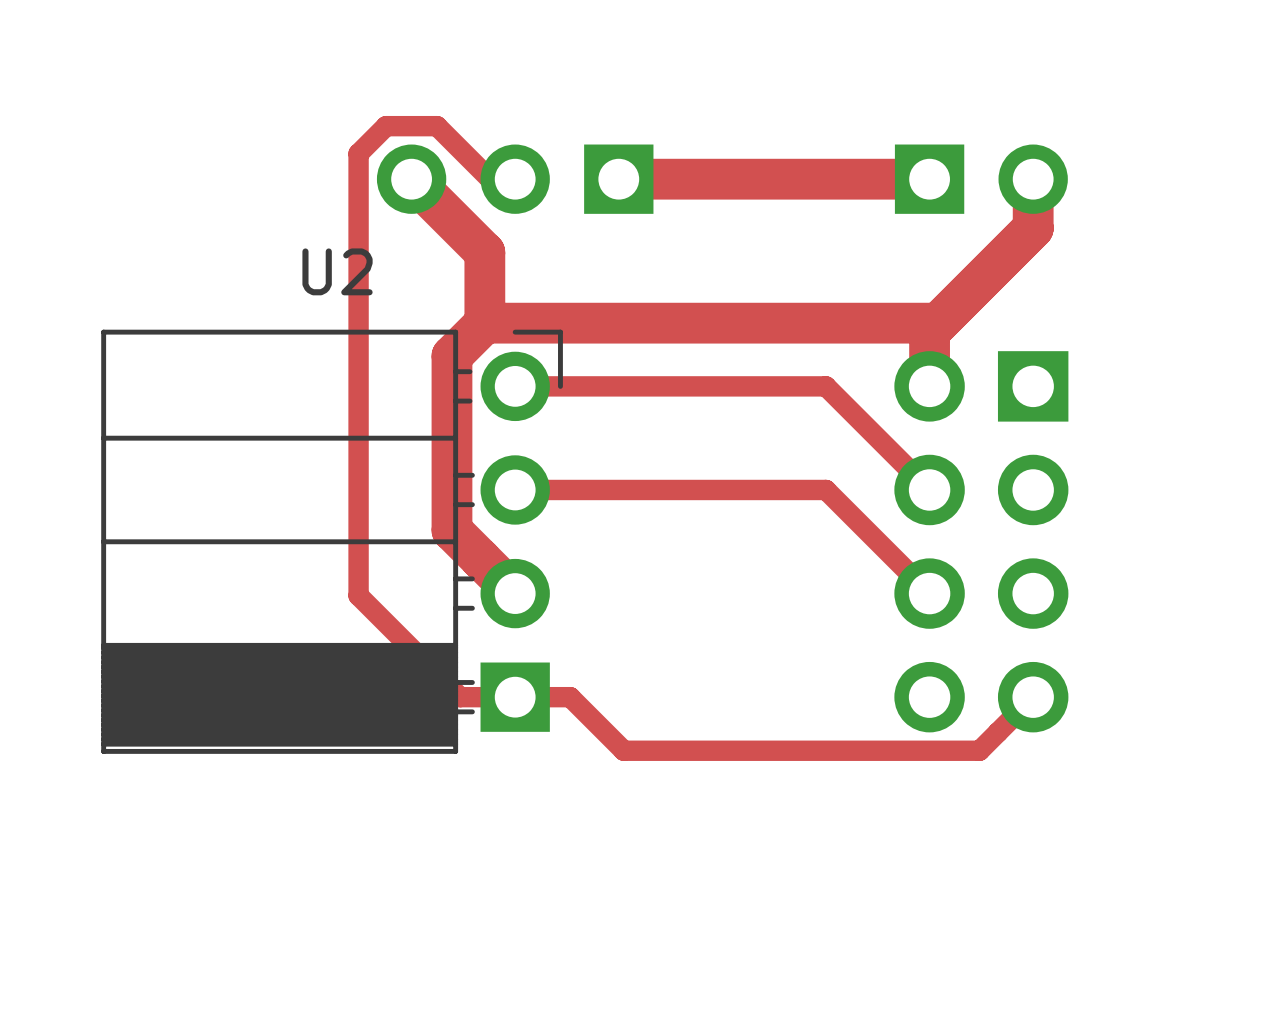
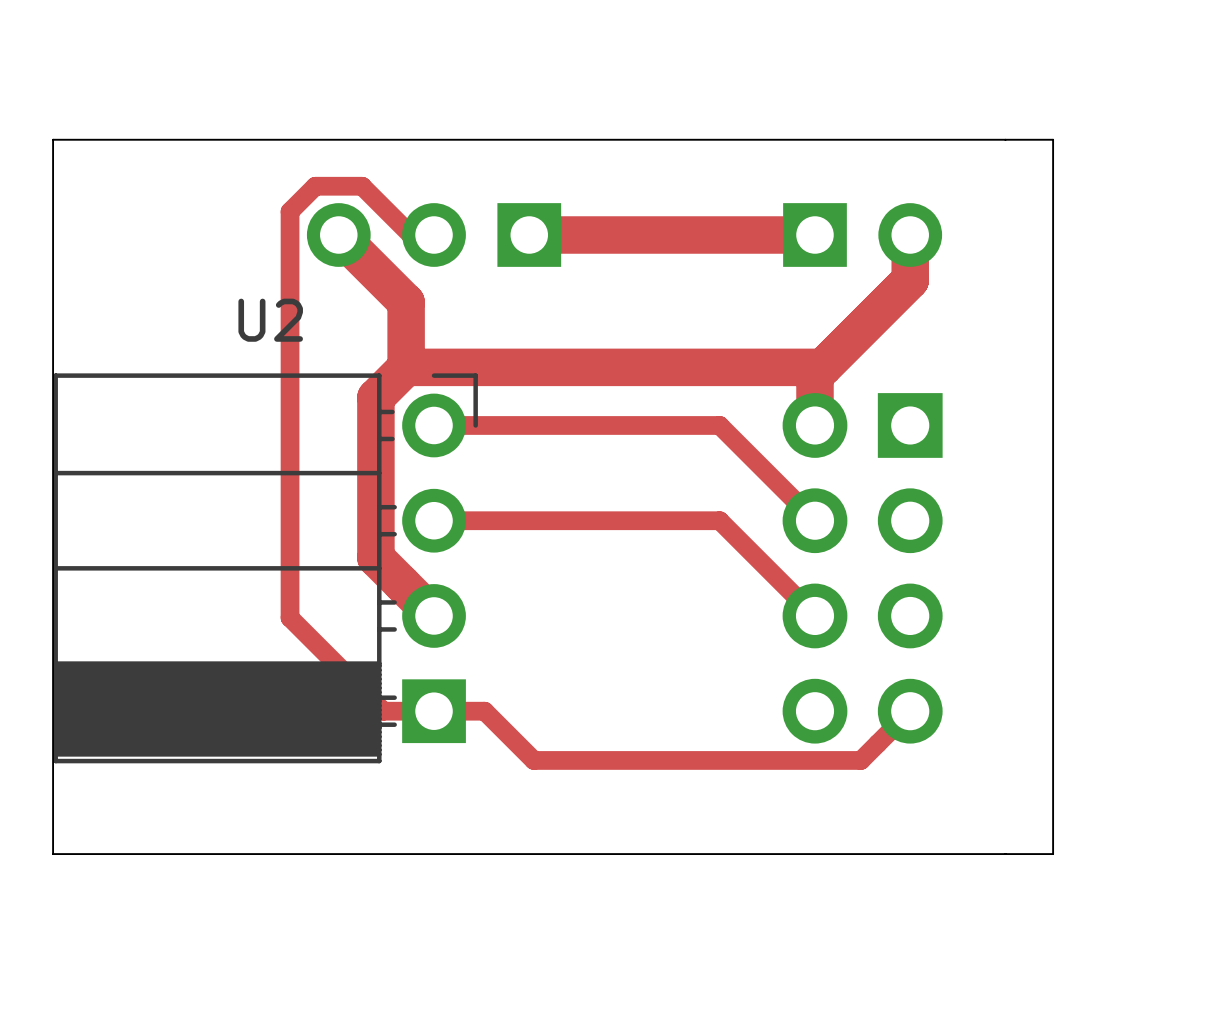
board edge: none -> (1053, 139) (1053, 854) (53, 854) (53, 139) (1053, 139)

